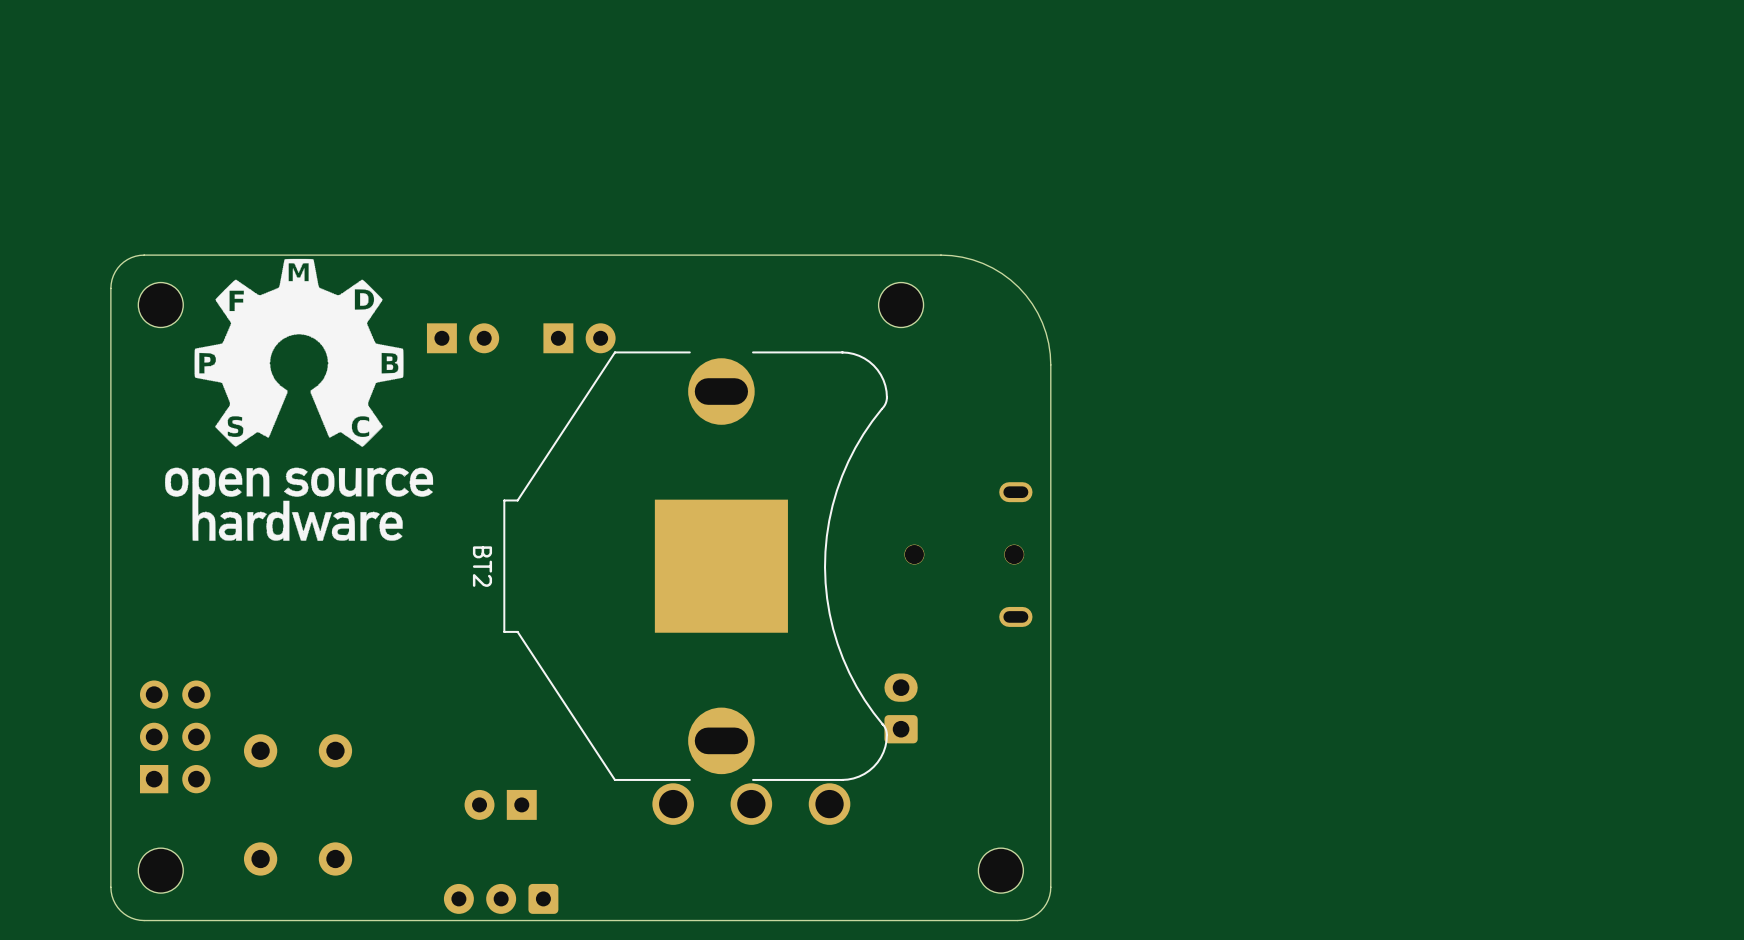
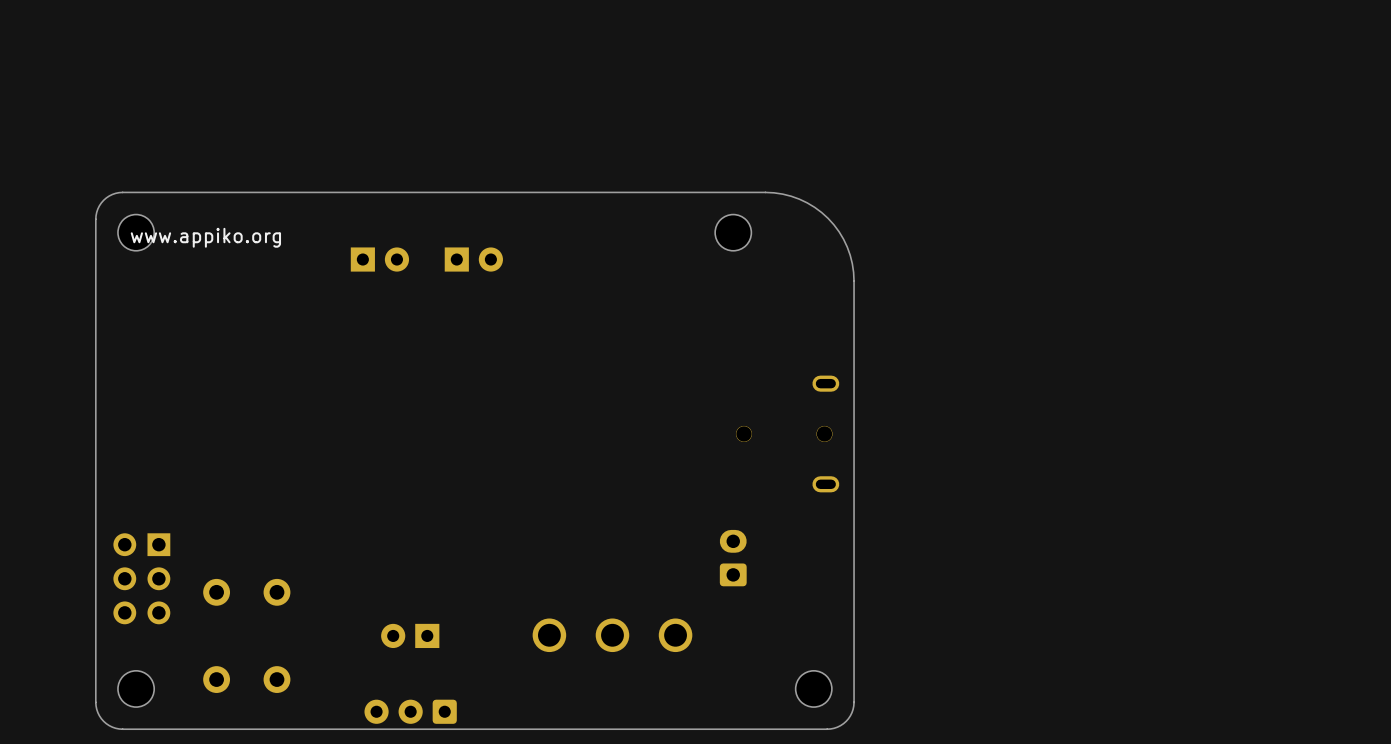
drawing: [165, 258, 434, 541] -> none
text: none -> www.appiko.org (205, 237)
BT2: (695, 566) -> none
part rotation: 0° (175, 736) -> 180° (141, 578)

